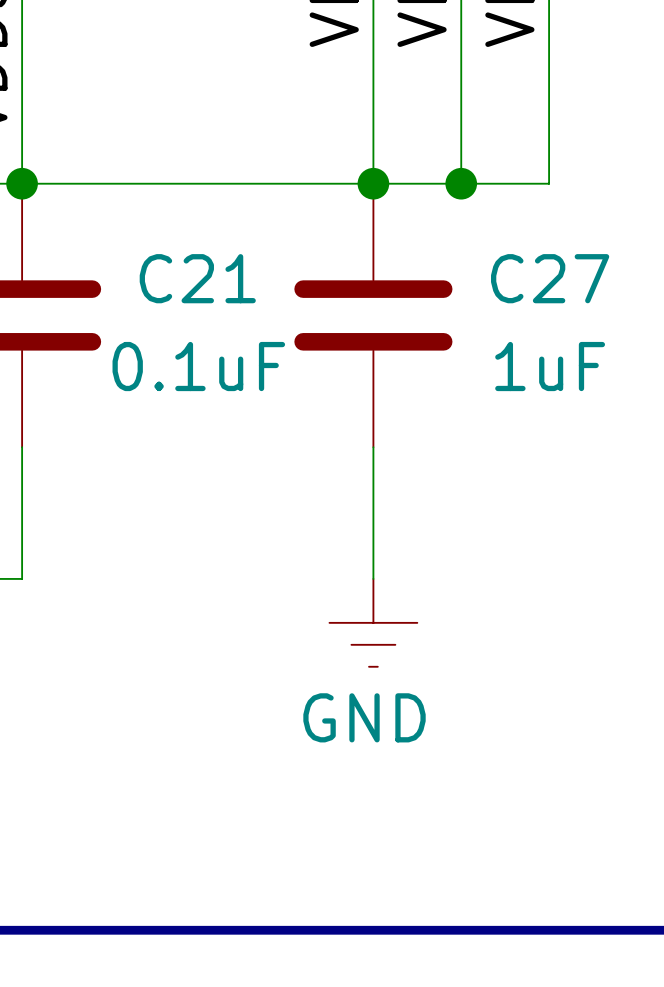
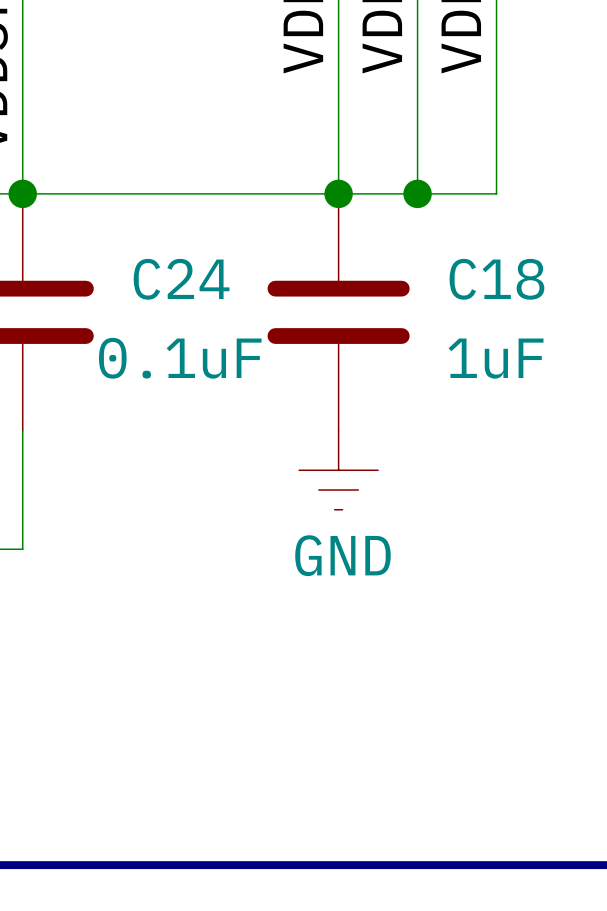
C21 name: C21 (197, 278) -> C24 (181, 279)
C27 name: C27 (550, 278) -> C18 (496, 279)
wire: (373, 447) (373, 578) -> none
power symbol position: GND (373, 622) -> GND (338, 470)

